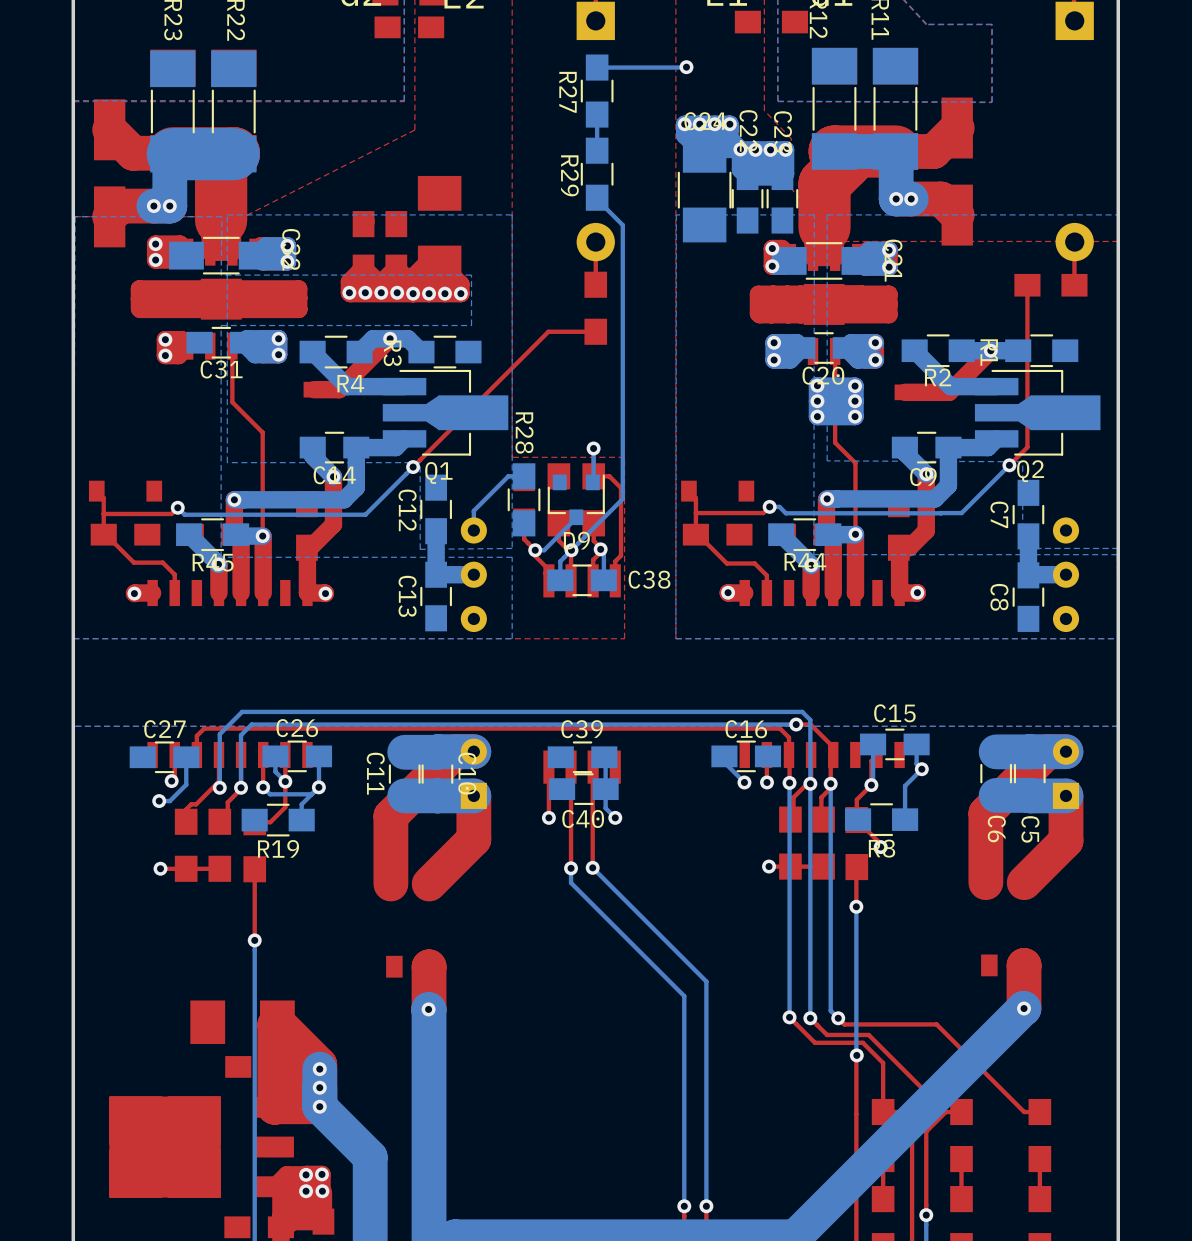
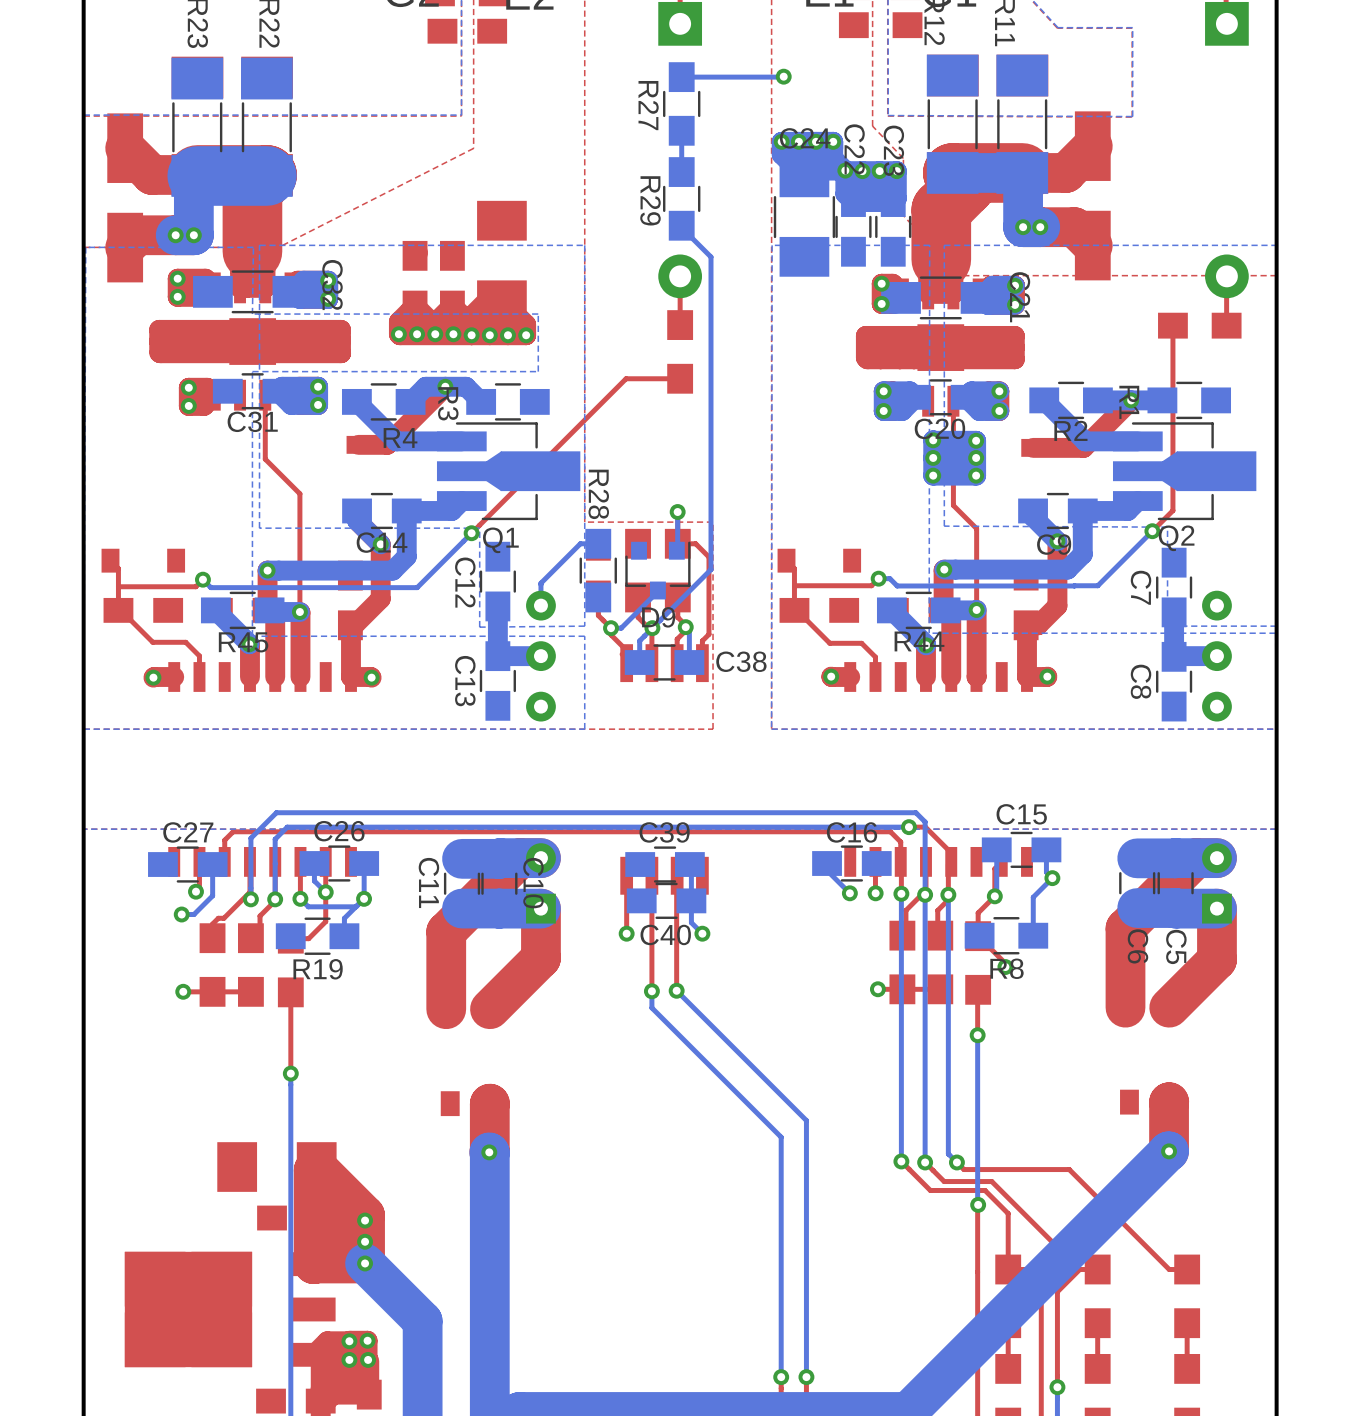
bottom track: (319, 1069) (319, 1106) -> none

